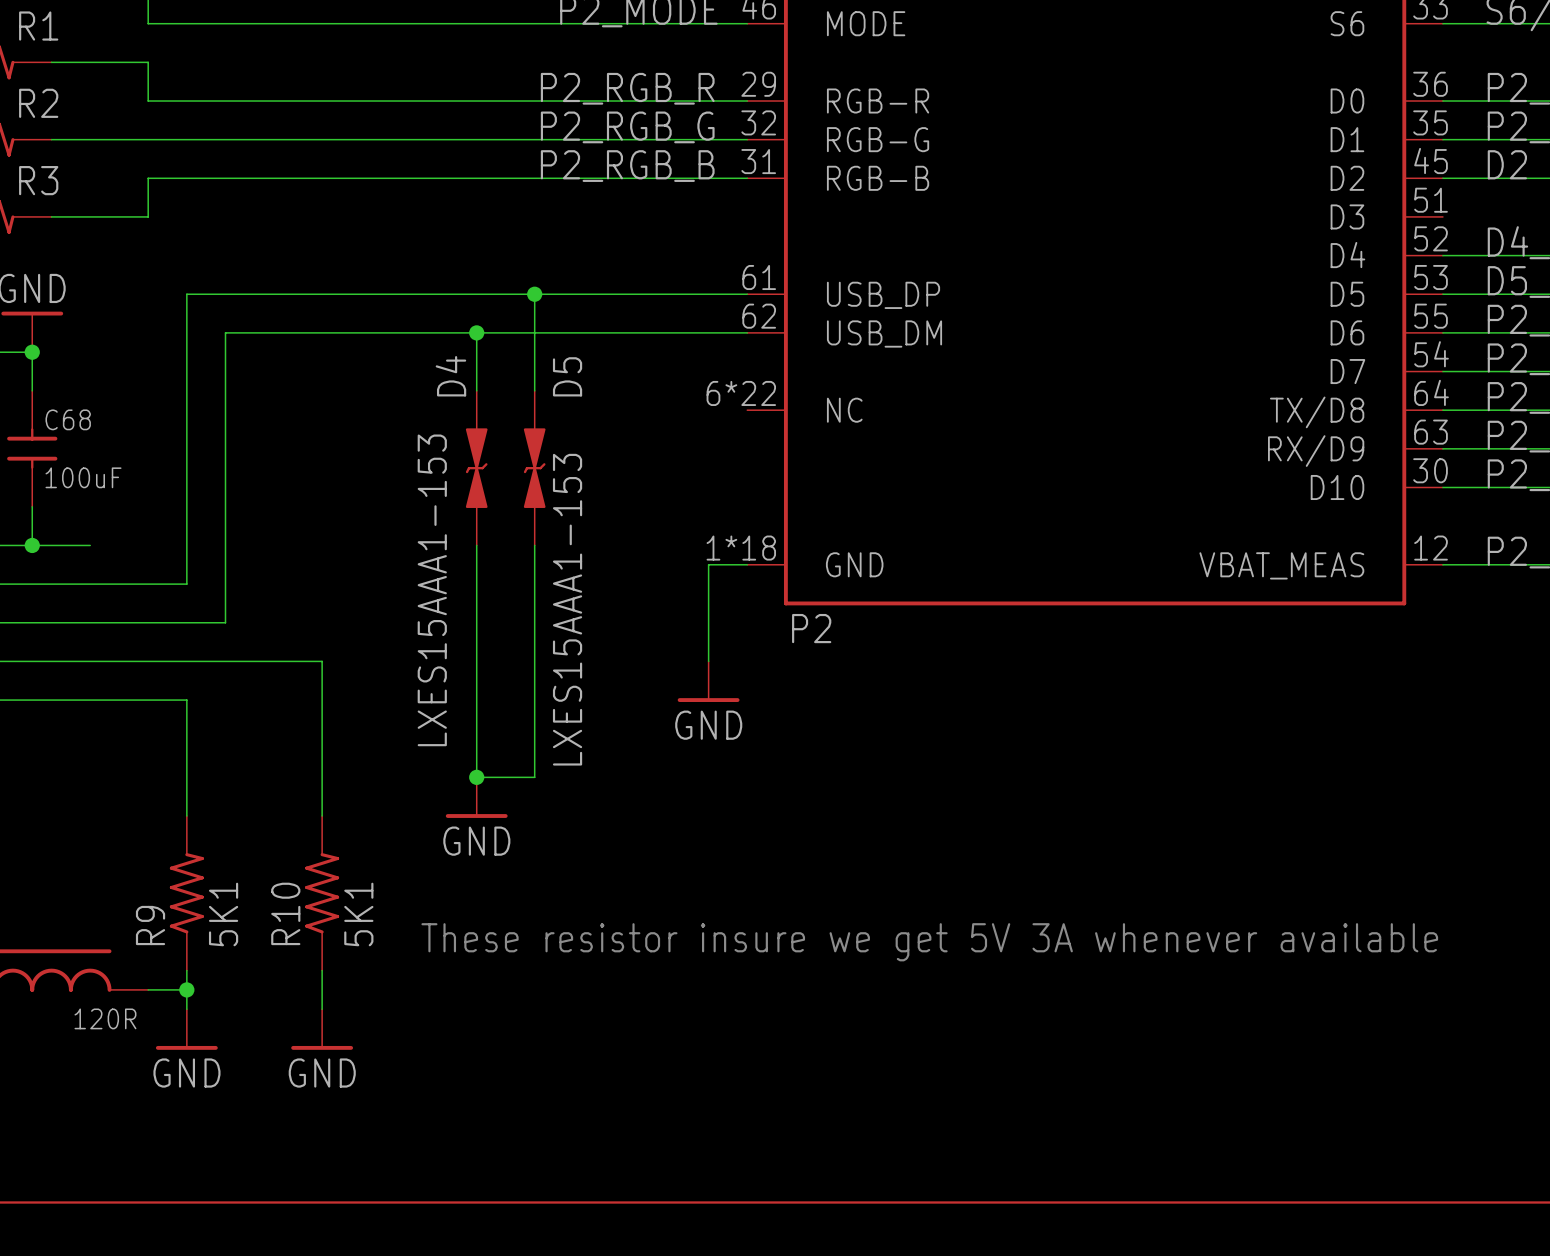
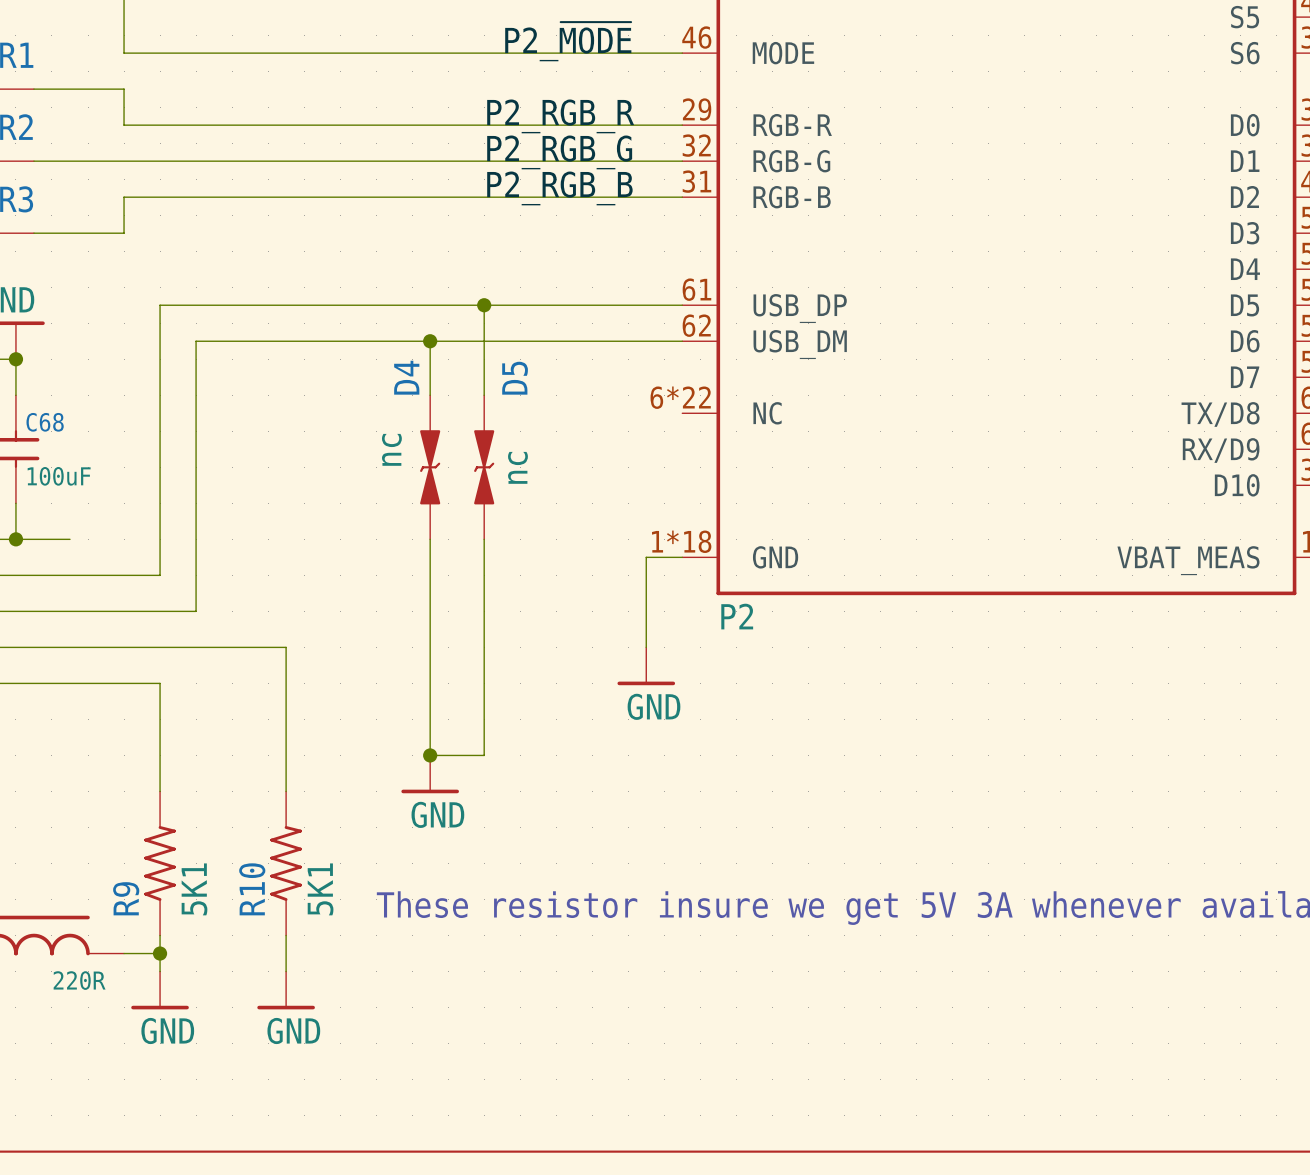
D4 value: LXES15AAA1-153 (432, 590) -> nc (391, 449)
D5 value: LXES15AAA1-153 (567, 609) -> nc (517, 467)
part value: 120R (105, 1018) -> 220R (79, 980)

